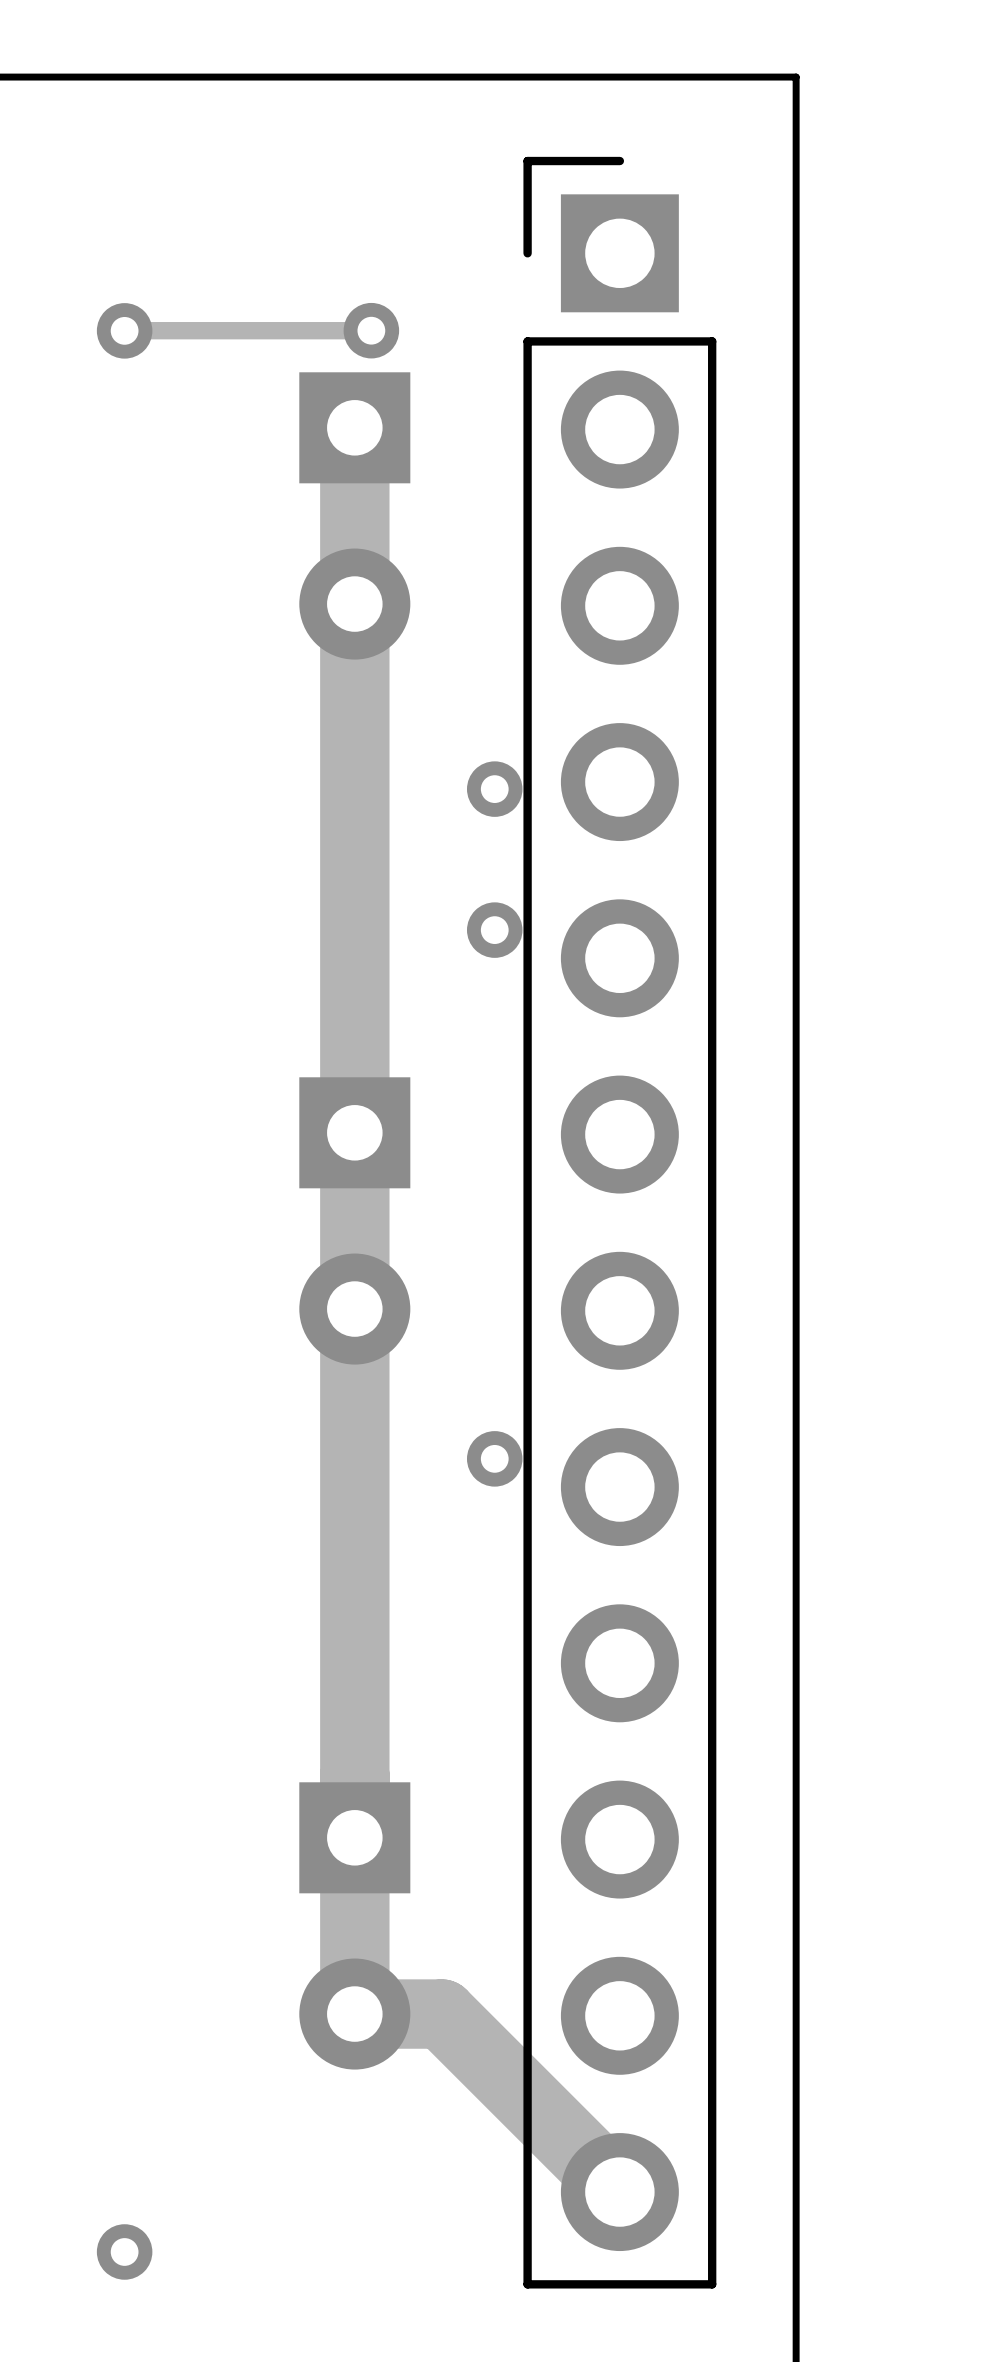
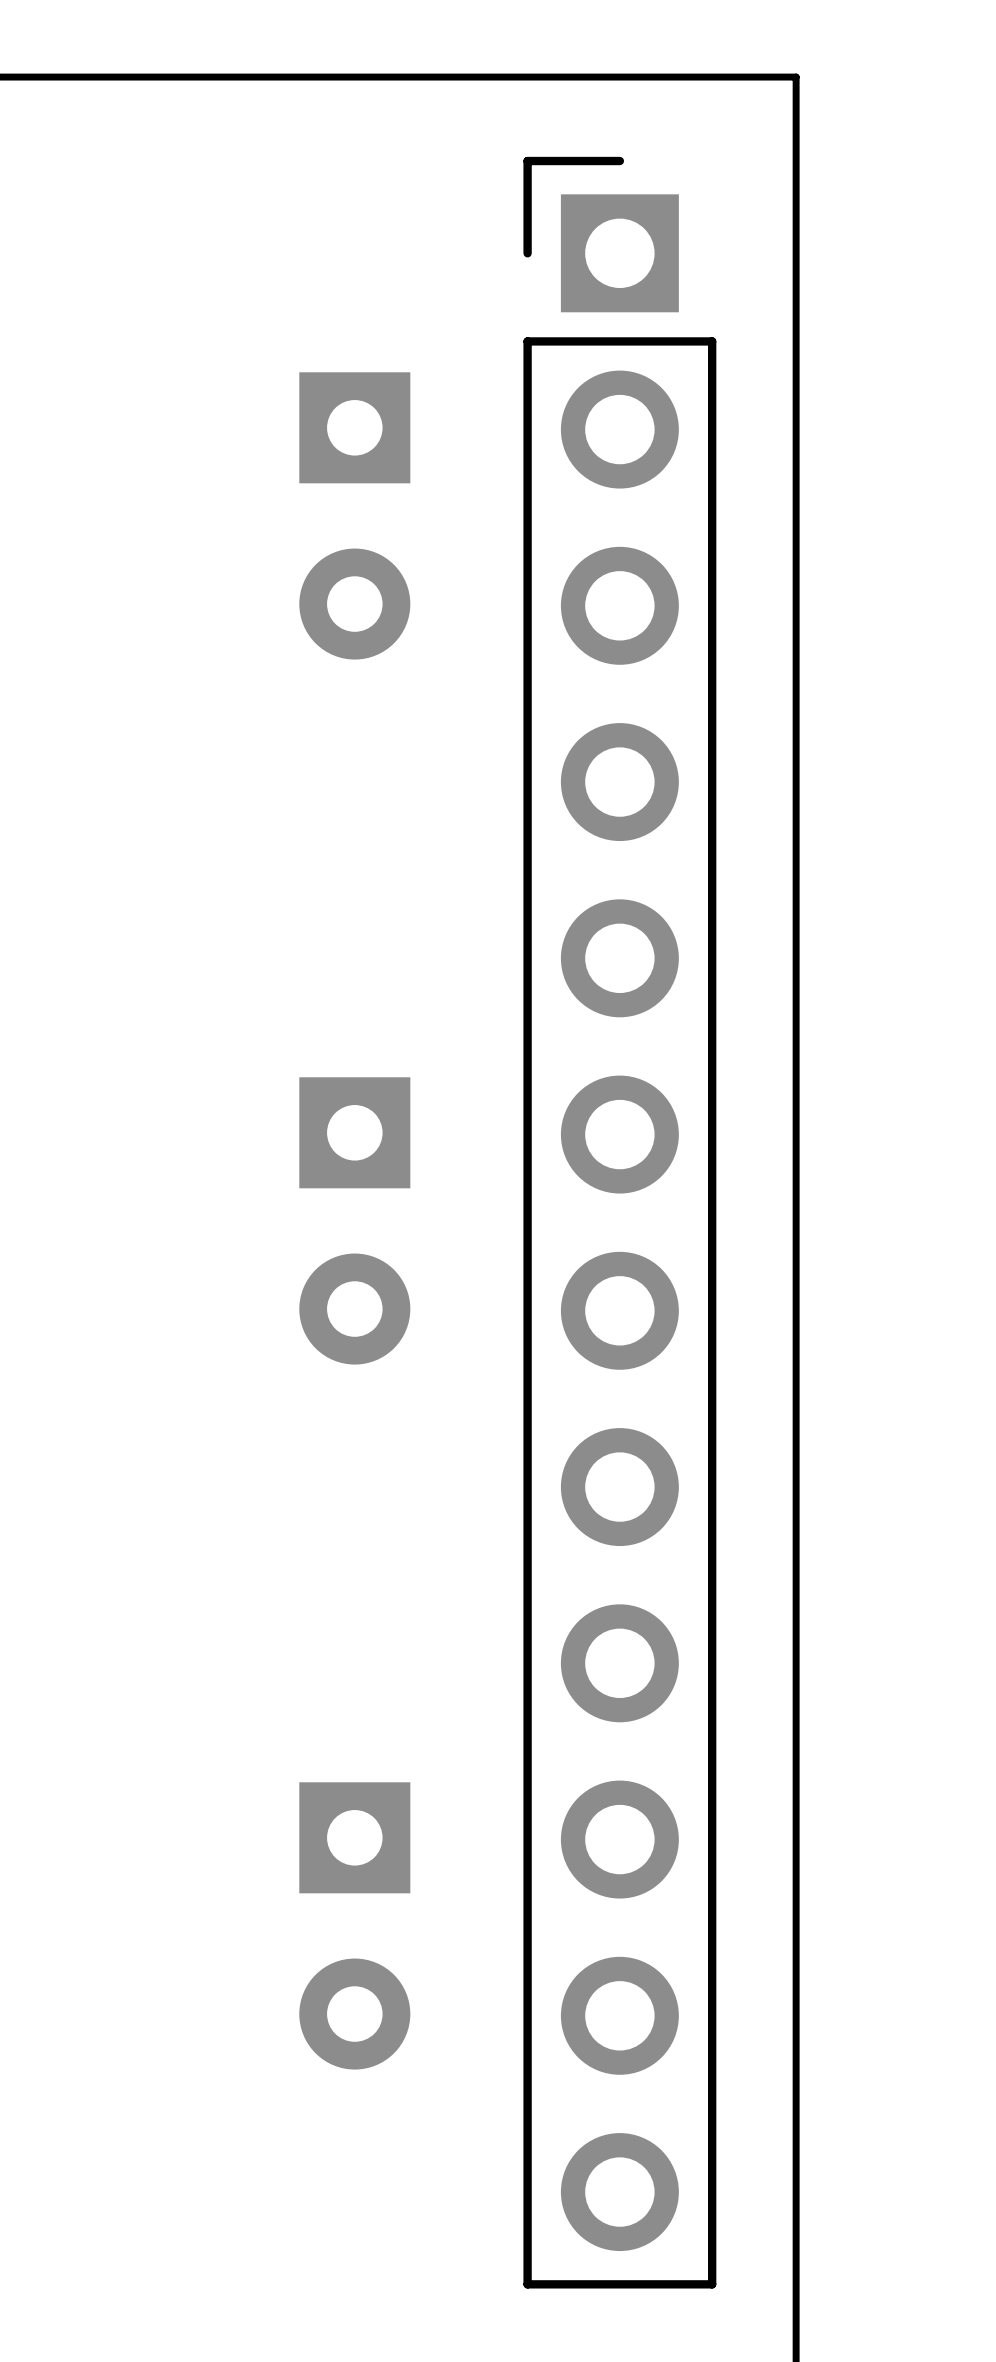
via: (124, 330) -> none
track: (371, 330) (124, 330) -> none
via: (371, 330) -> none
track: (354, 427) (354, 2014) (441, 2014) (619, 2192) -> none
via: (494, 789) -> none
via: (494, 930) -> none
via: (494, 1458) -> none
via: (124, 2251) -> none

